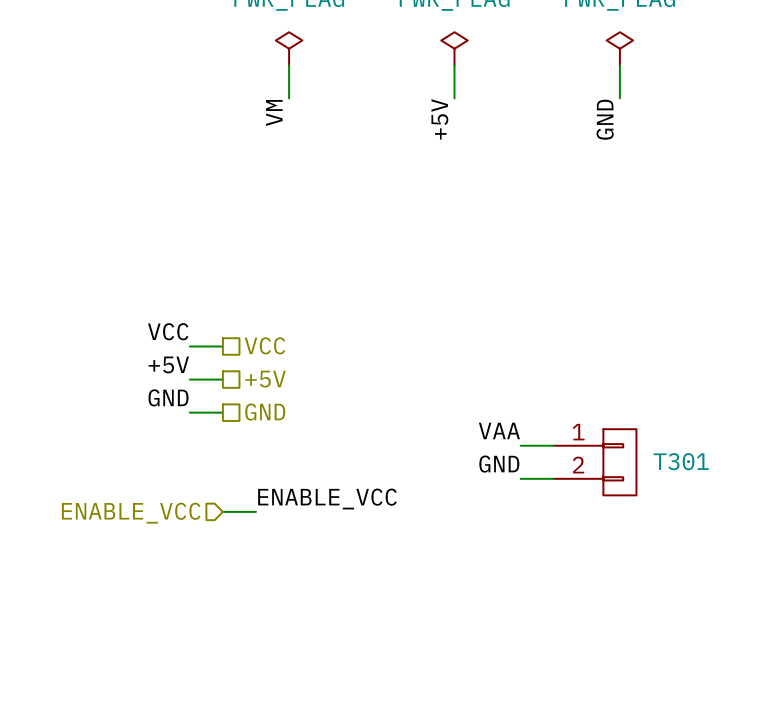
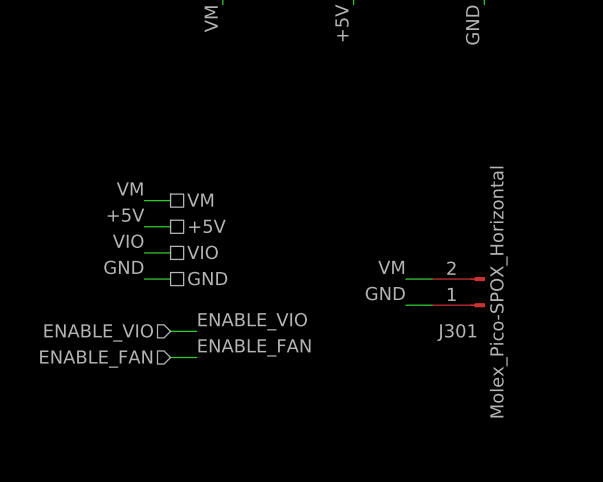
label: VCC (168, 331) -> VM (129, 188)
hierarchical label: VCC (264, 345) -> VM (200, 200)
label: GND (168, 397) -> VIO (128, 241)
hierarchical label: GND (265, 412) -> VIO (202, 252)
label: none -> GND (123, 267)
label: VAA (499, 430) -> VM (391, 267)
wire: none -> (144, 279) (170, 279)
hierarchical label: none -> GND (207, 278)
J301: none -> Molex_Pico-SPOX_Horizontal (458, 292)
T301: (595, 462) -> none
label: ENABLE_VCC (327, 499) -> ENABLE_VIO (252, 321)
hierarchical label: ENABLE_VCC (131, 513) -> ENABLE_VIO (98, 332)
label: none -> ENABLE_FAN (254, 347)
wire: none -> (170, 357) (196, 357)
hierarchical label: none -> ENABLE_FAN (96, 359)

